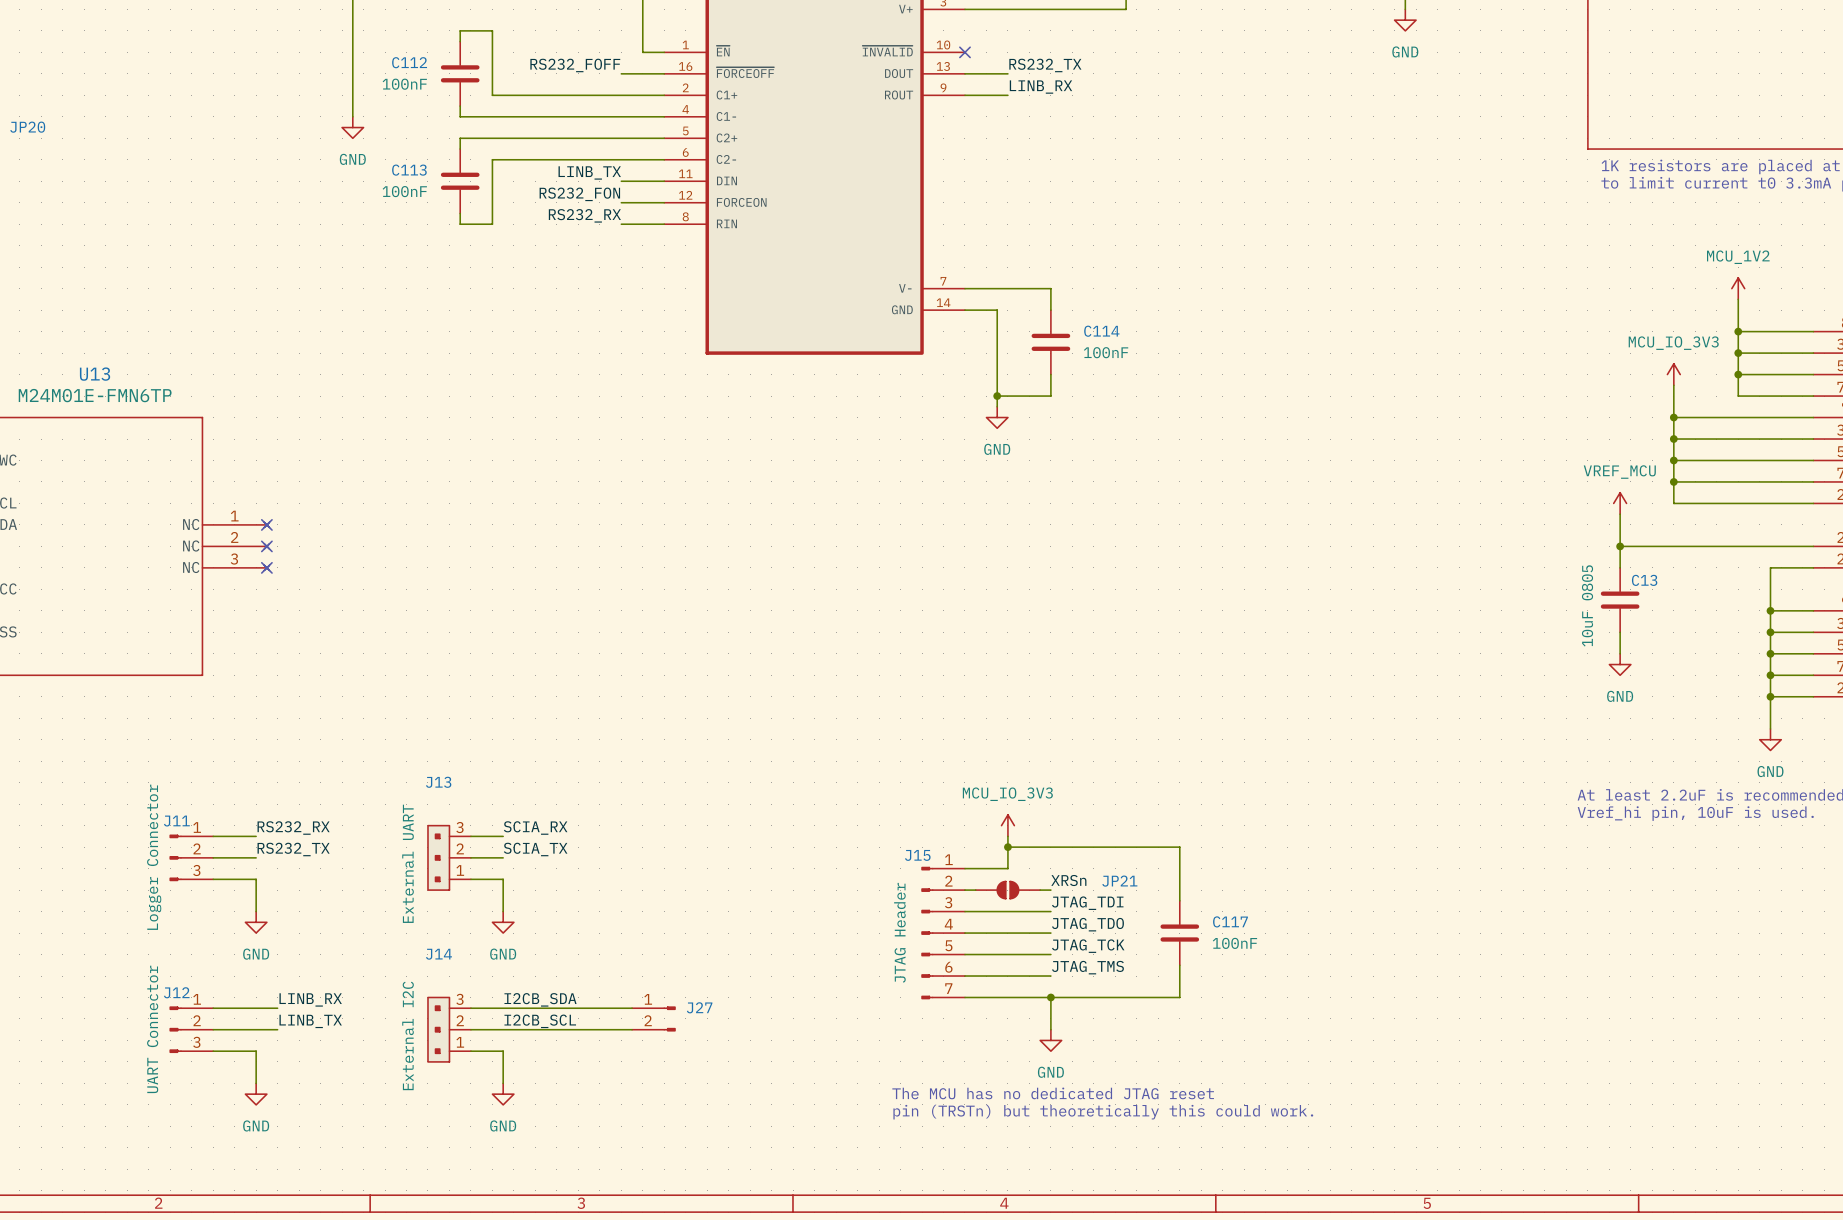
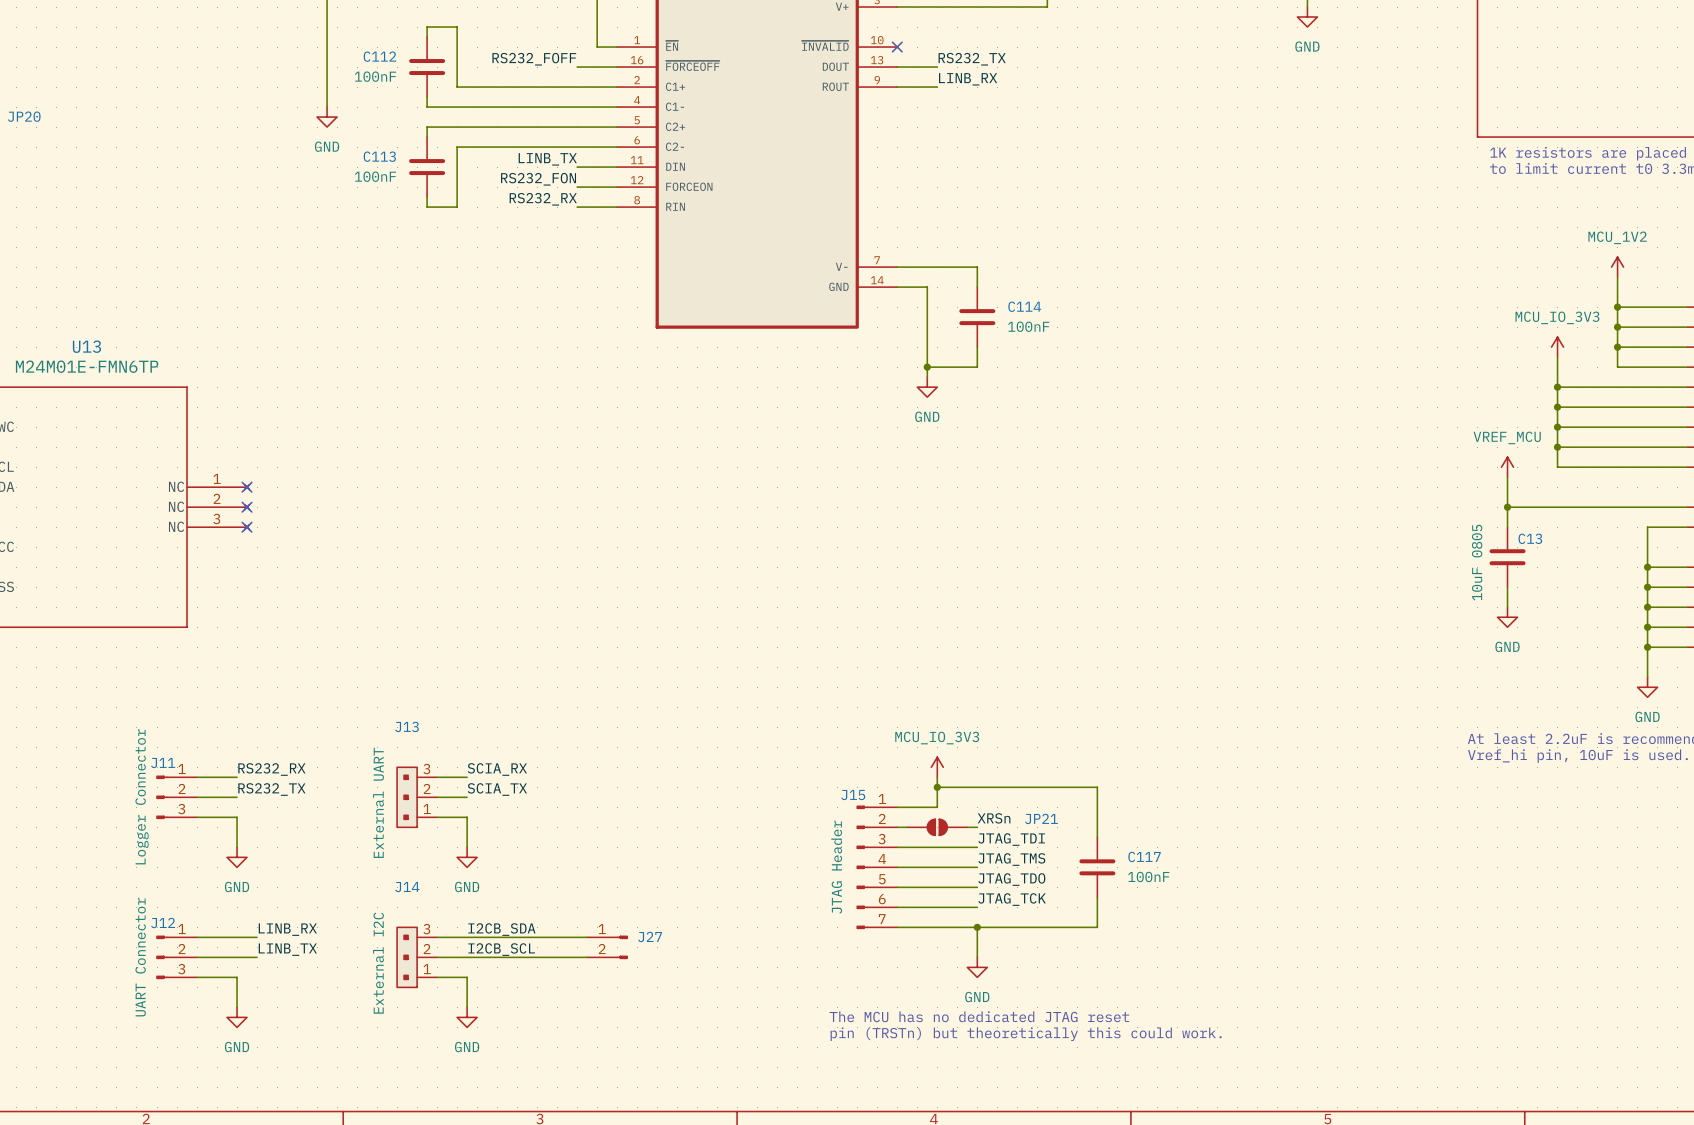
label: JTAG_TDO (1087, 924) -> JTAG_TMS (1011, 859)
label: JTAG_TCK (1088, 946) -> JTAG_TDO (1011, 879)
label: JTAG_TMS (1087, 967) -> JTAG_TCK (1012, 899)

